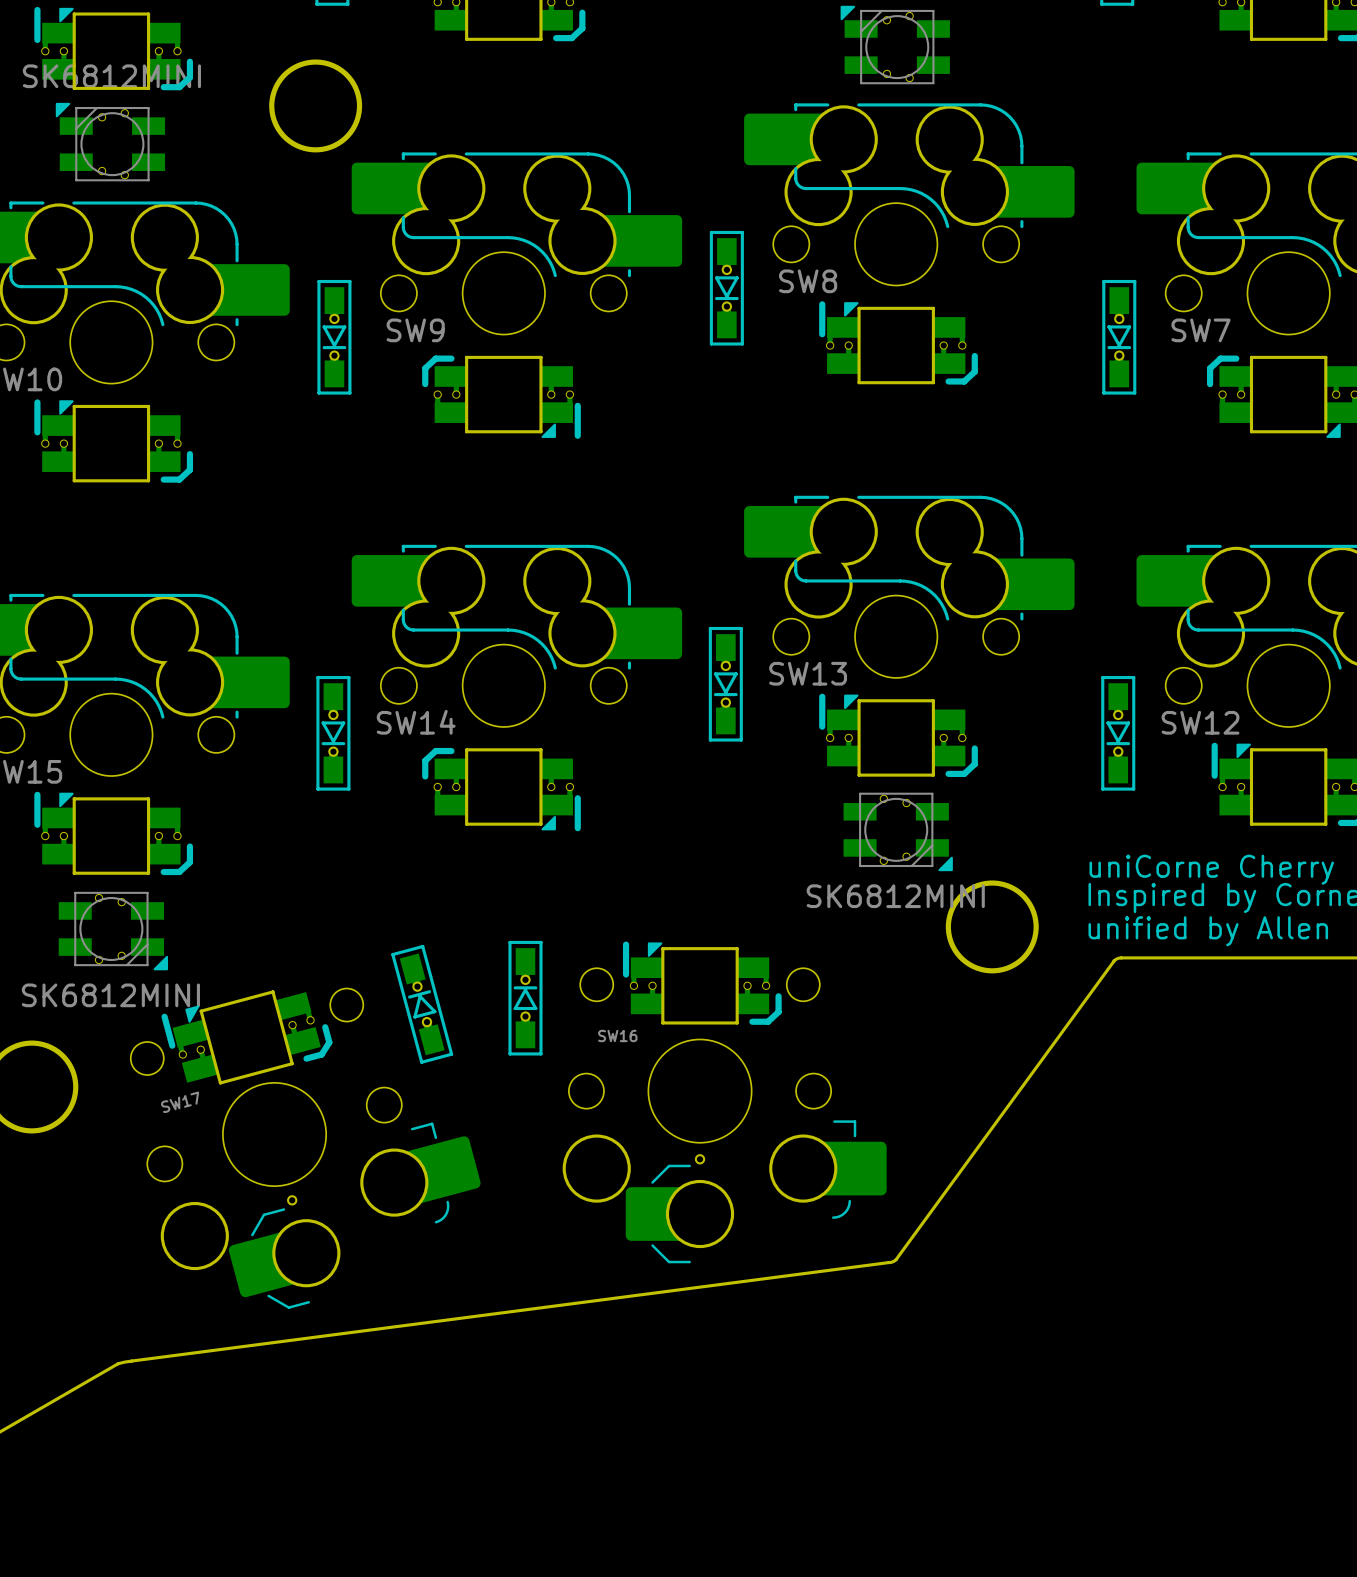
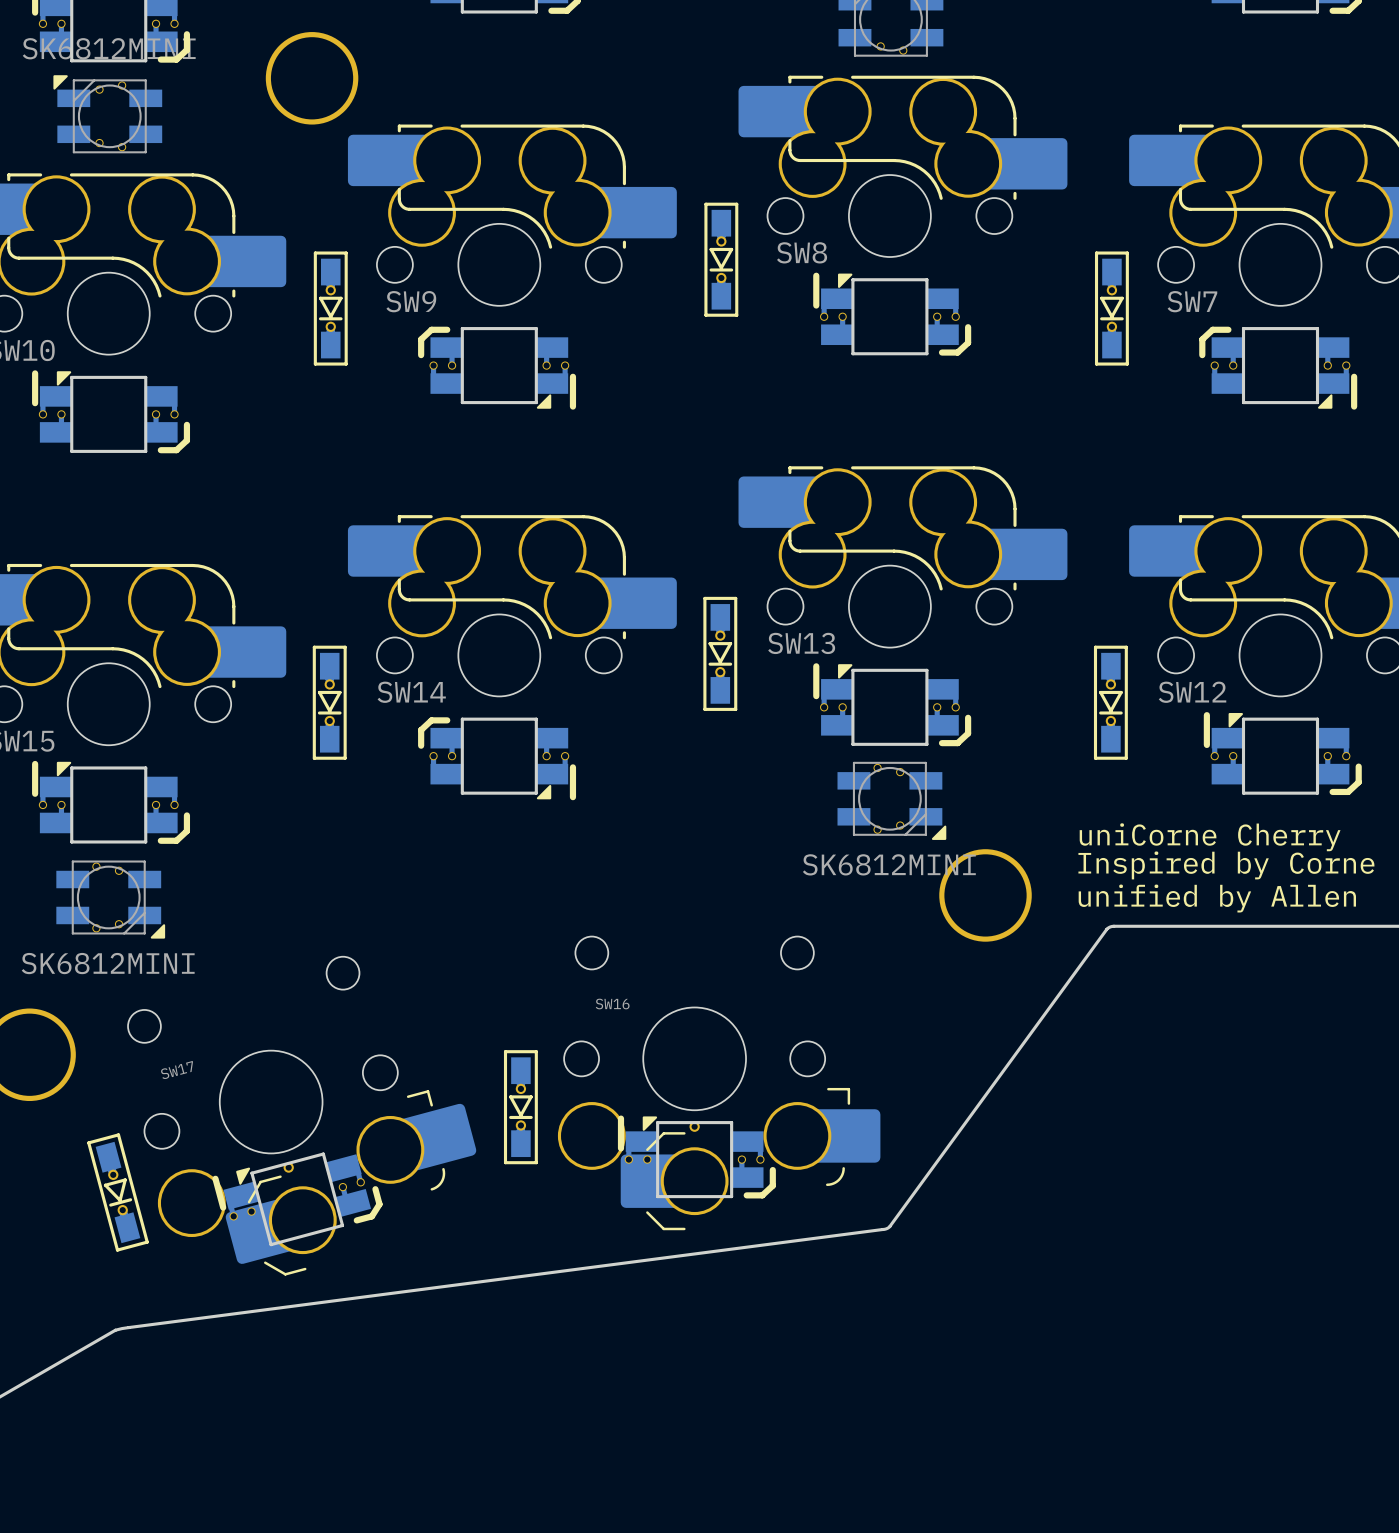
part position: (702, 983) -> (696, 1156)
part rotation: 0° (525, 998) -> 180° (520, 1107)
part position: (525, 998) -> (520, 1107)
part rotation: 0° (422, 1004) -> 180° (118, 1192)
part position: (422, 1004) -> (118, 1192)
part position: (246, 1037) -> (297, 1199)

